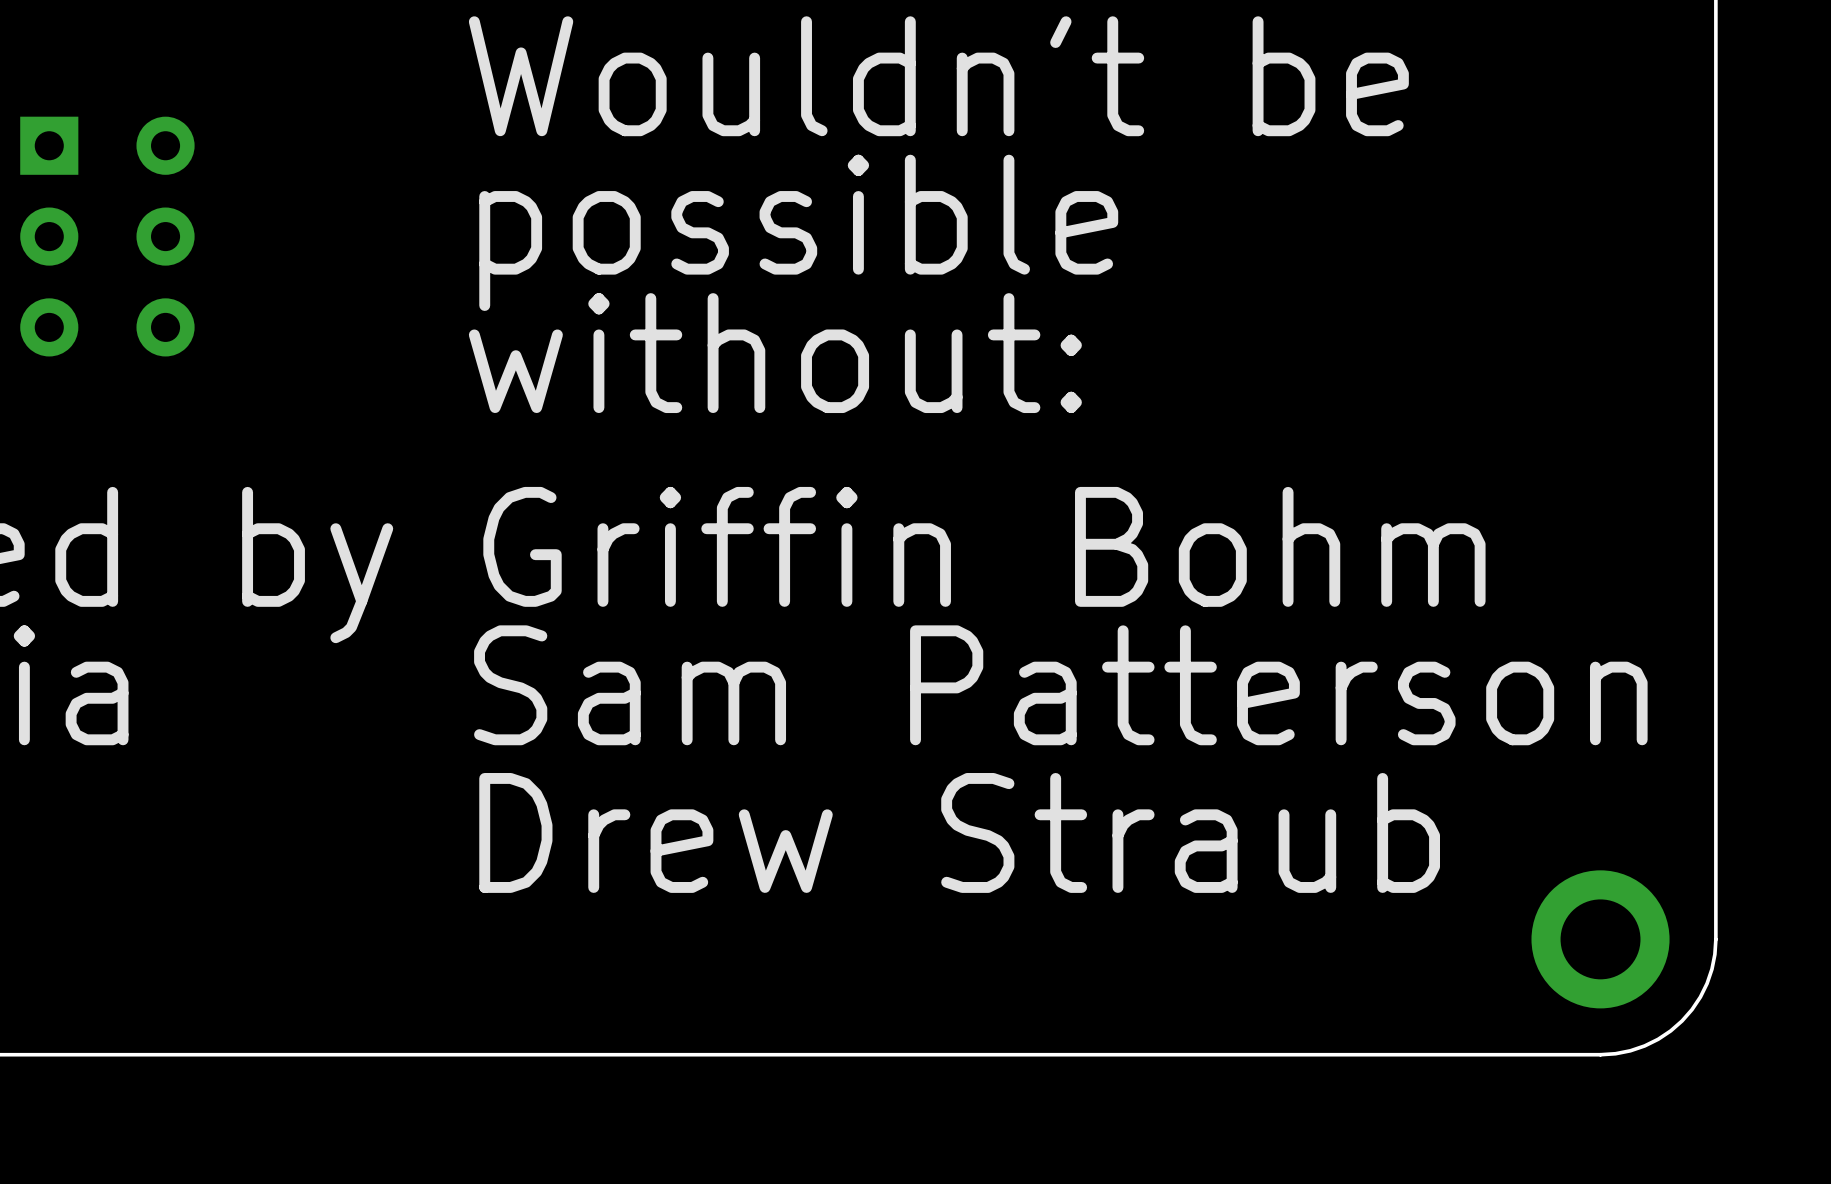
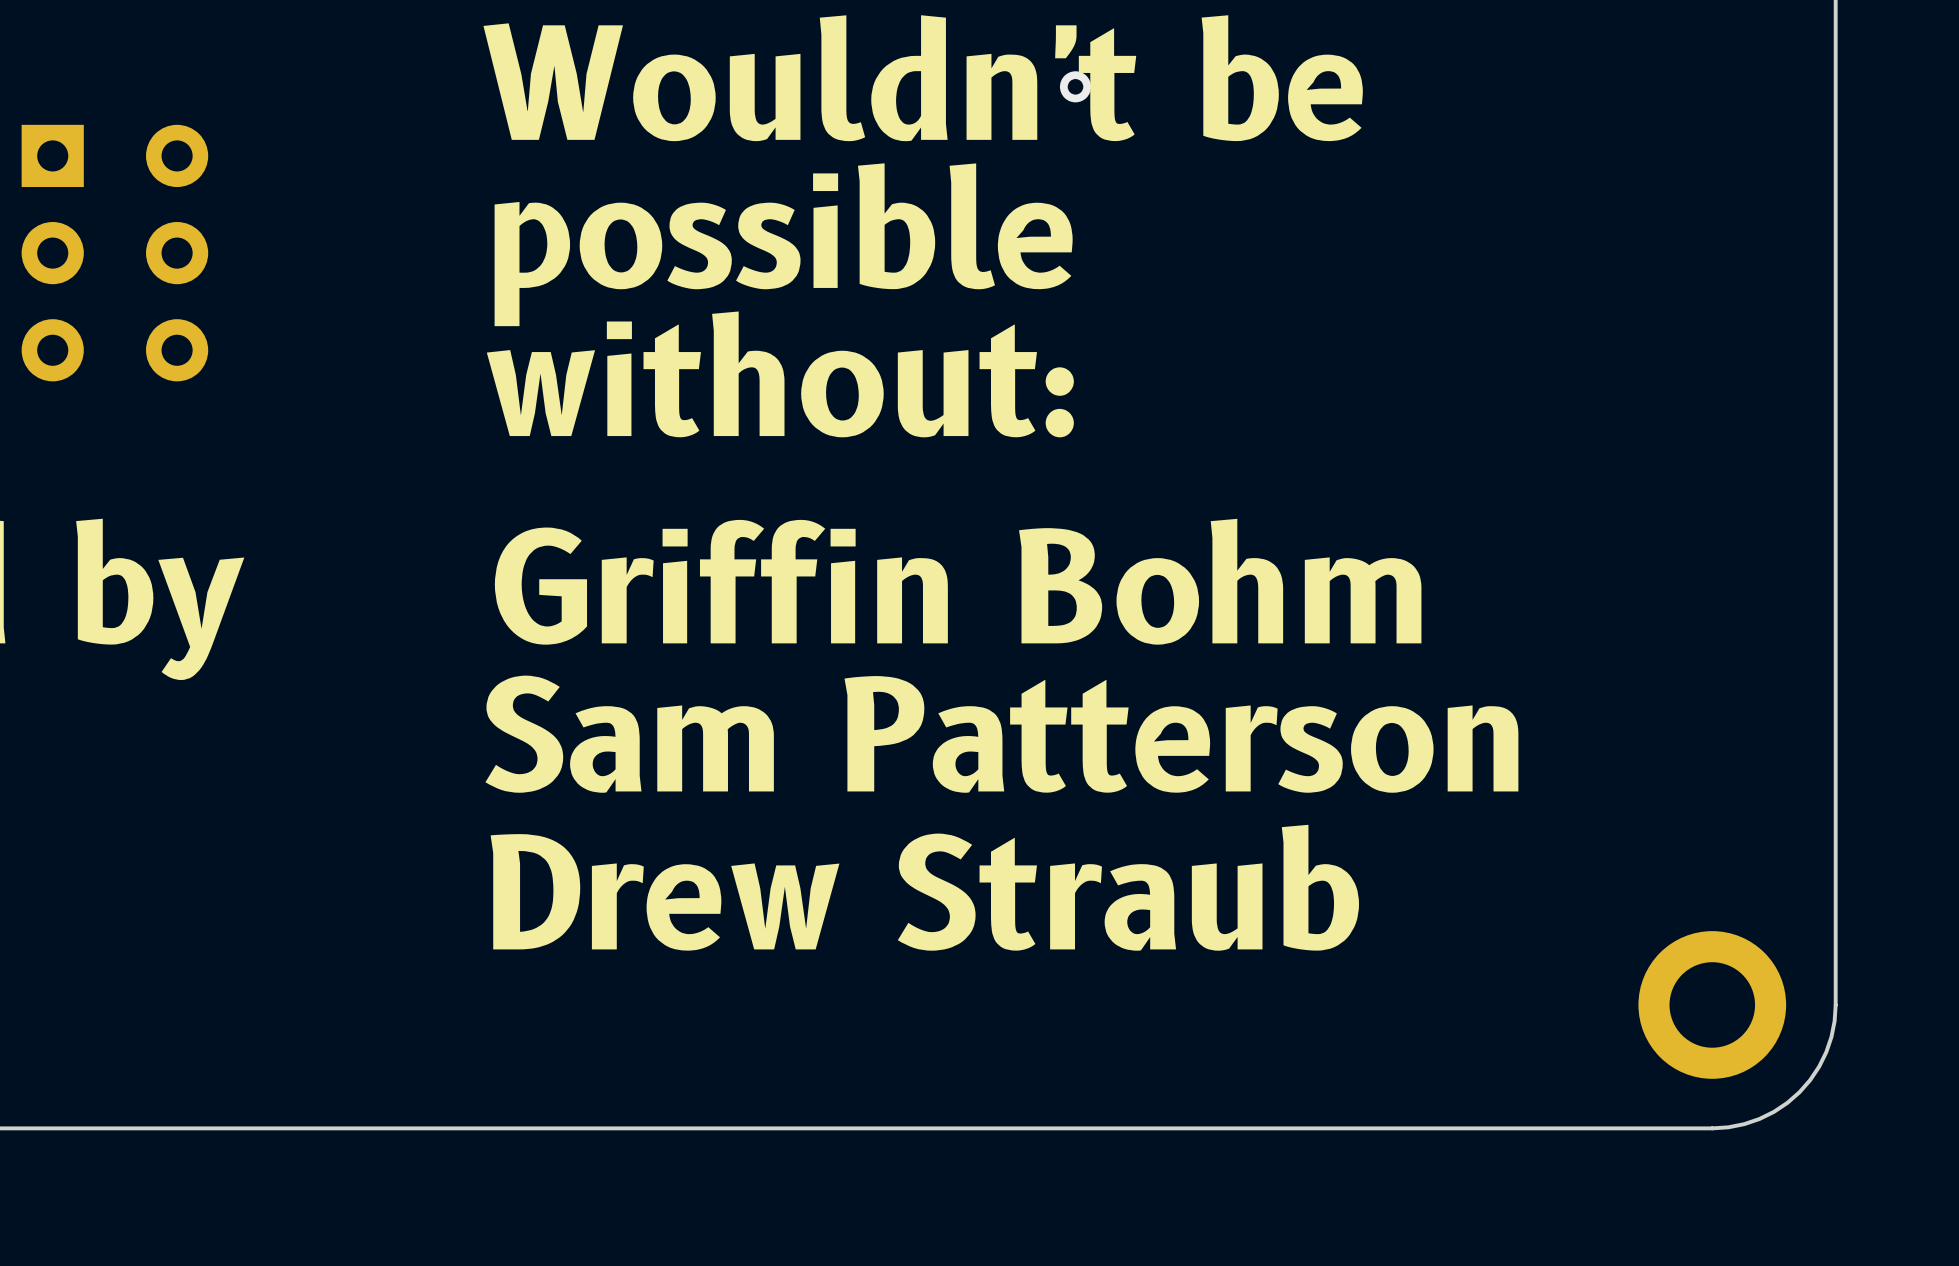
via: none -> (1075, 86)

